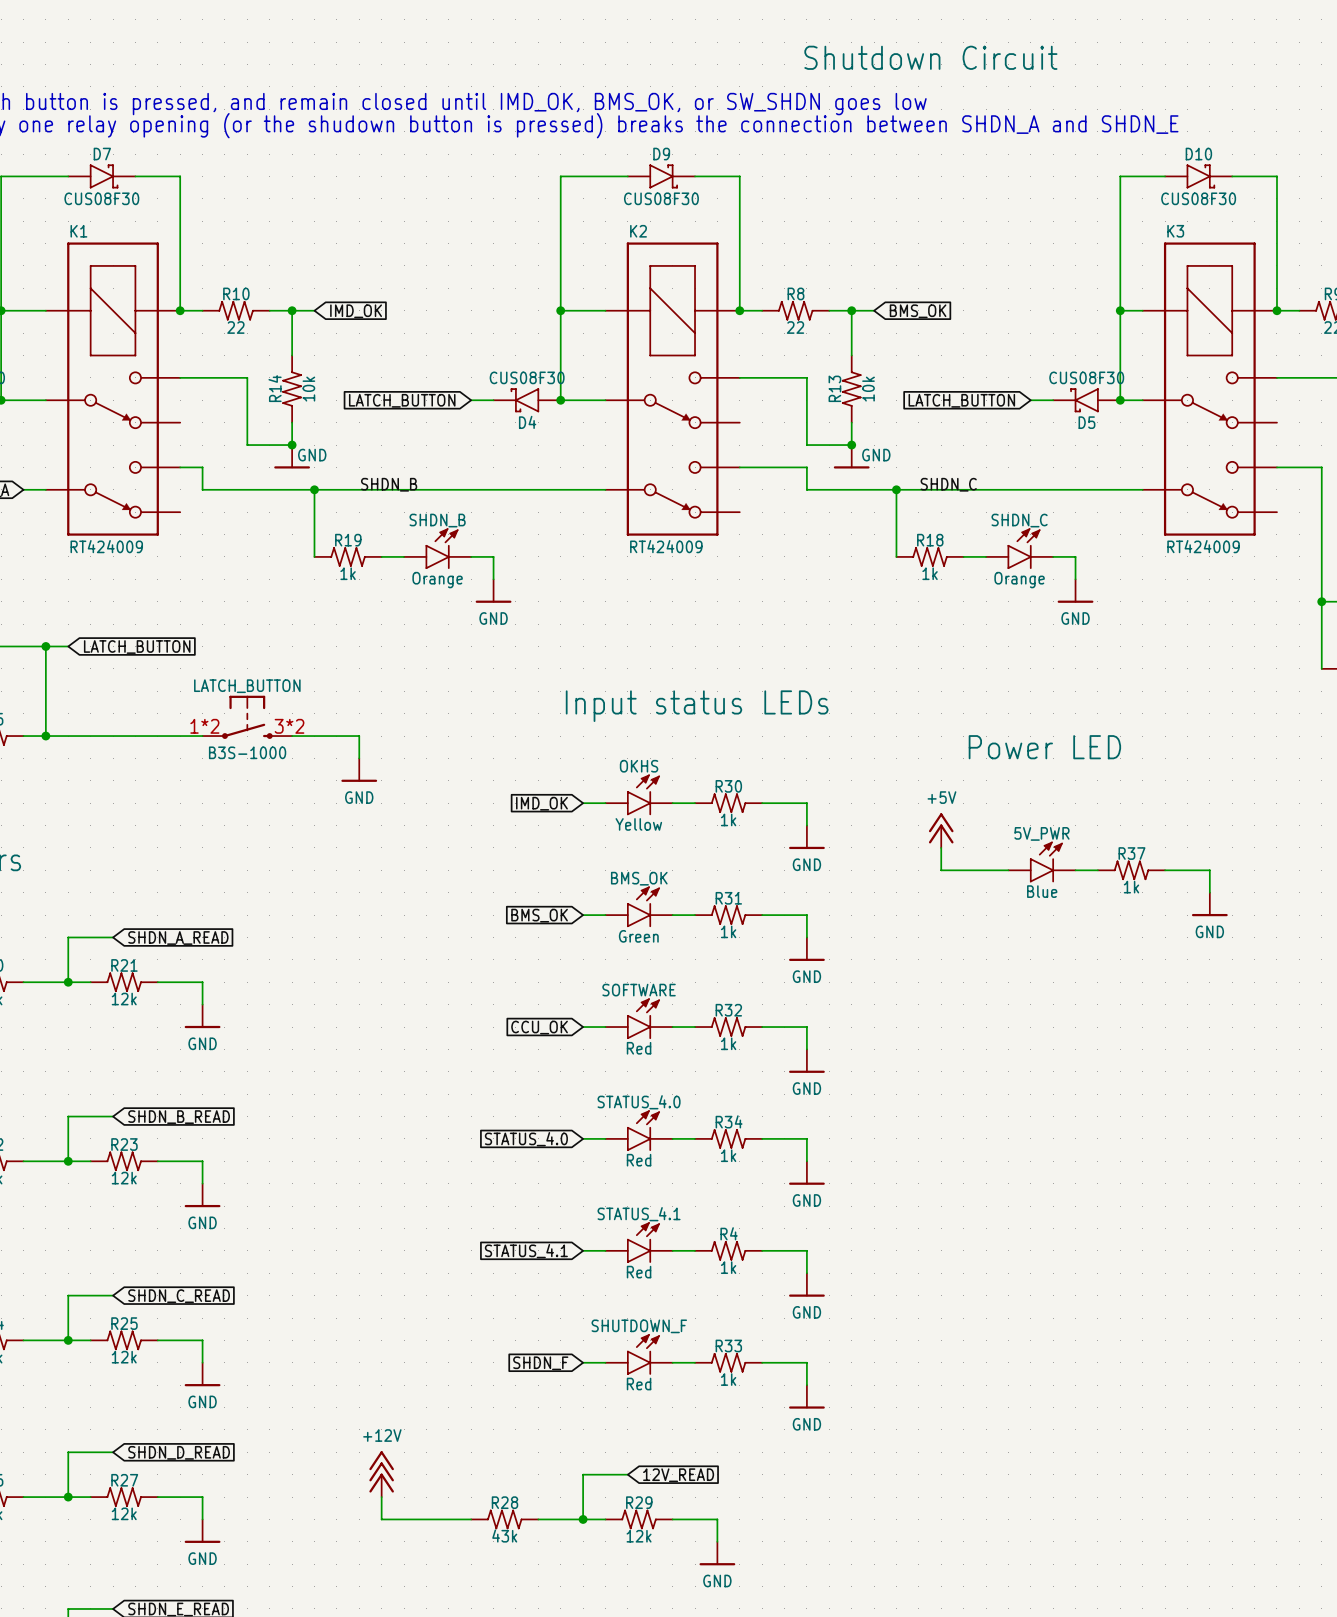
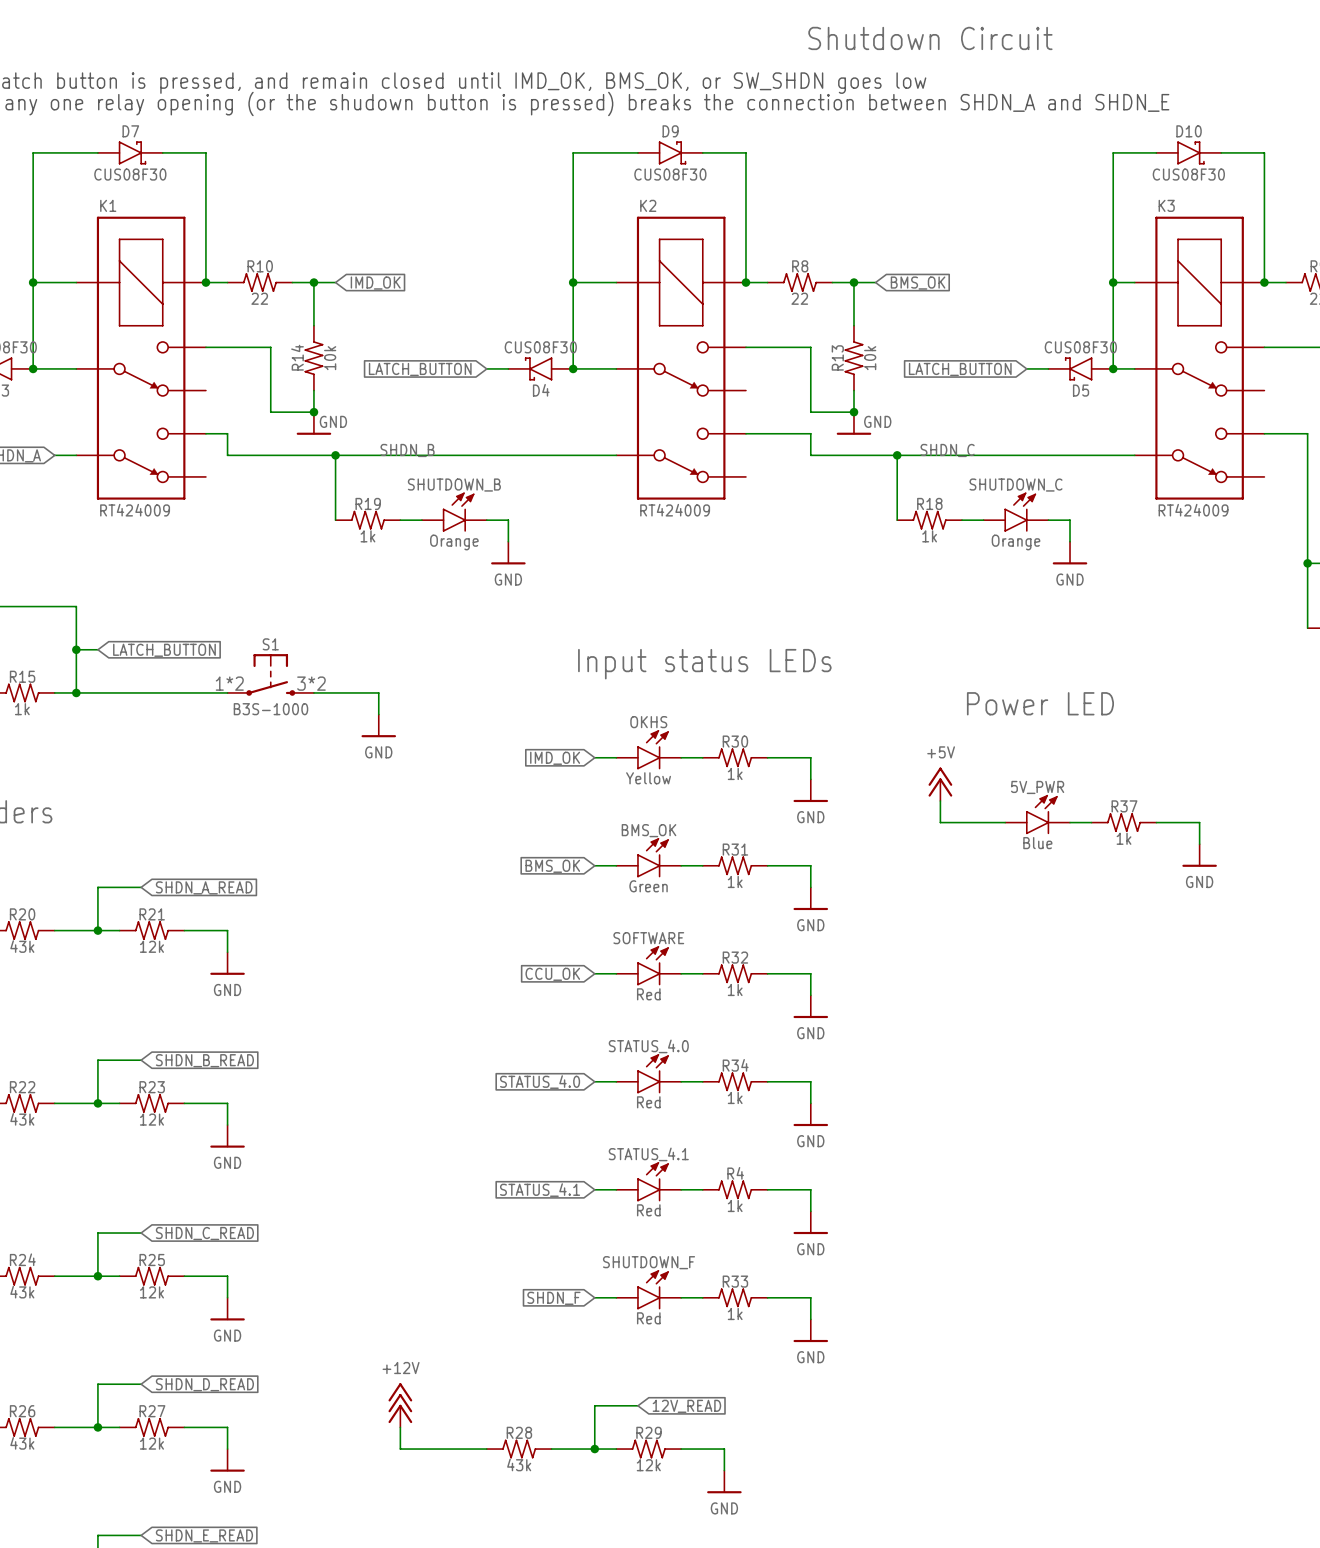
SHDN_B name: SHDN_B (437, 520) -> SHUTDOWN_B (454, 485)
SHDN_C name: SHDN_C (1019, 520) -> SHUTDOWN_C (1016, 485)
wire: (45, 646) (68, 646) -> (76, 649) (97, 649)
junction position: (45, 646) -> (76, 649)
global label position: LATCH_BUTTON (137, 647) -> LATCH_BUTTON (164, 650)
LATCH_BUTTON name: LATCH_BUTTON (247, 686) -> S1 (270, 644)

